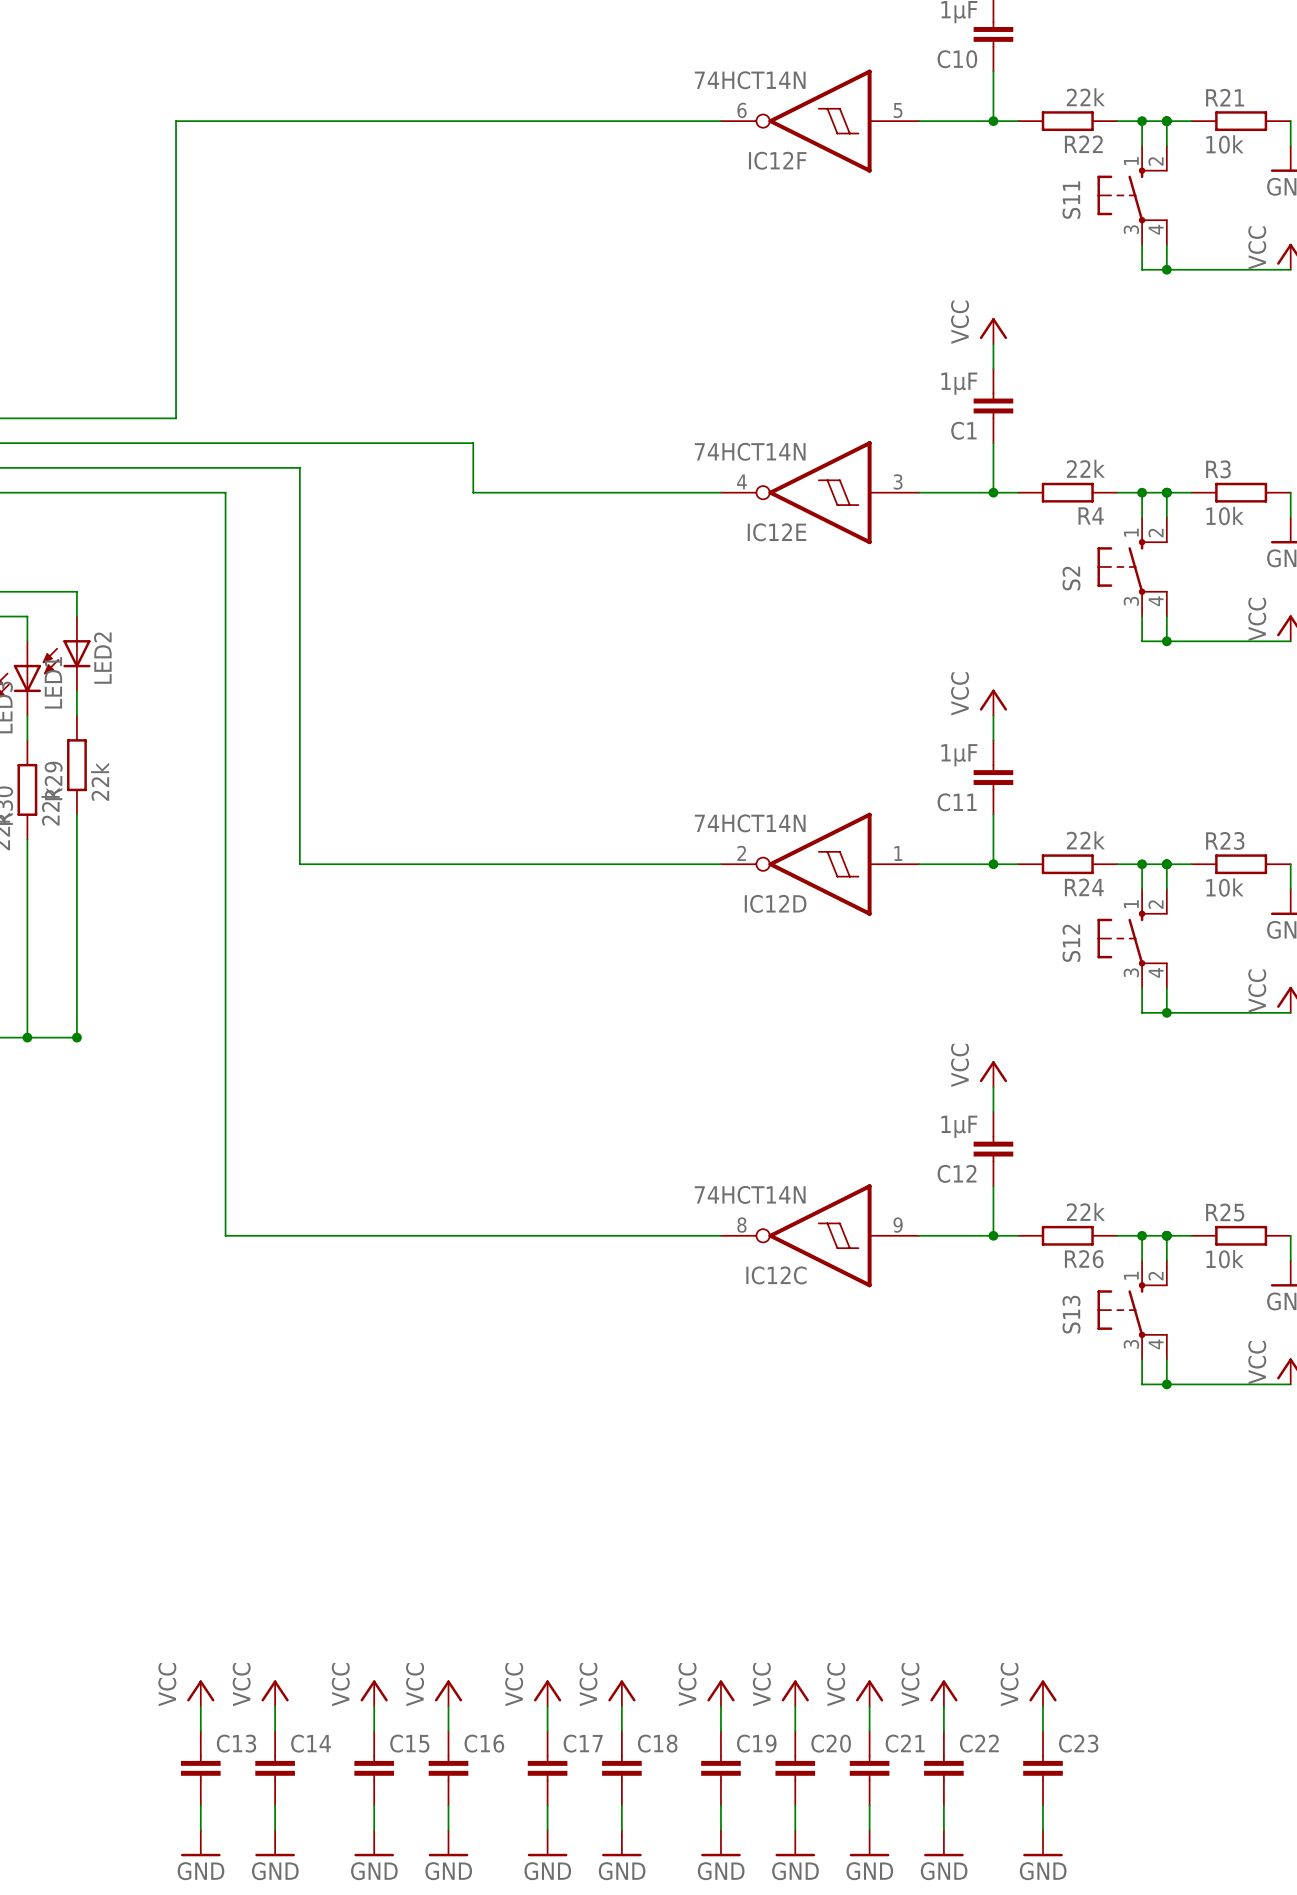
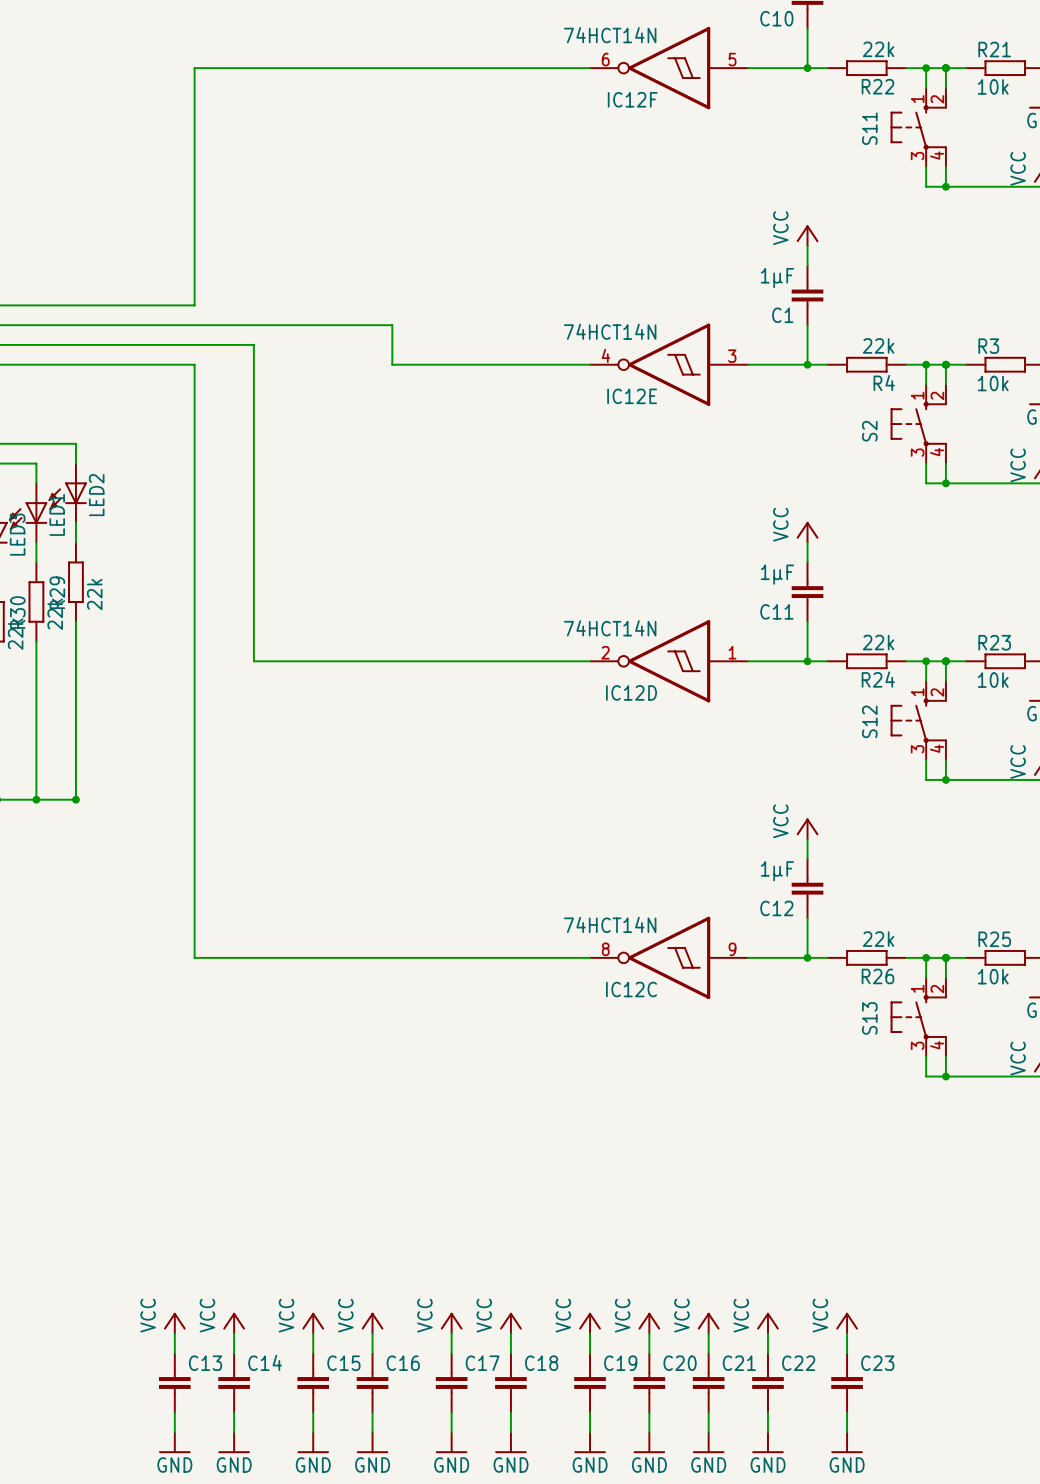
wire: (225, 121) (176, 121) (176, 418) -> (194, 68) (194, 305) (155, 305)

